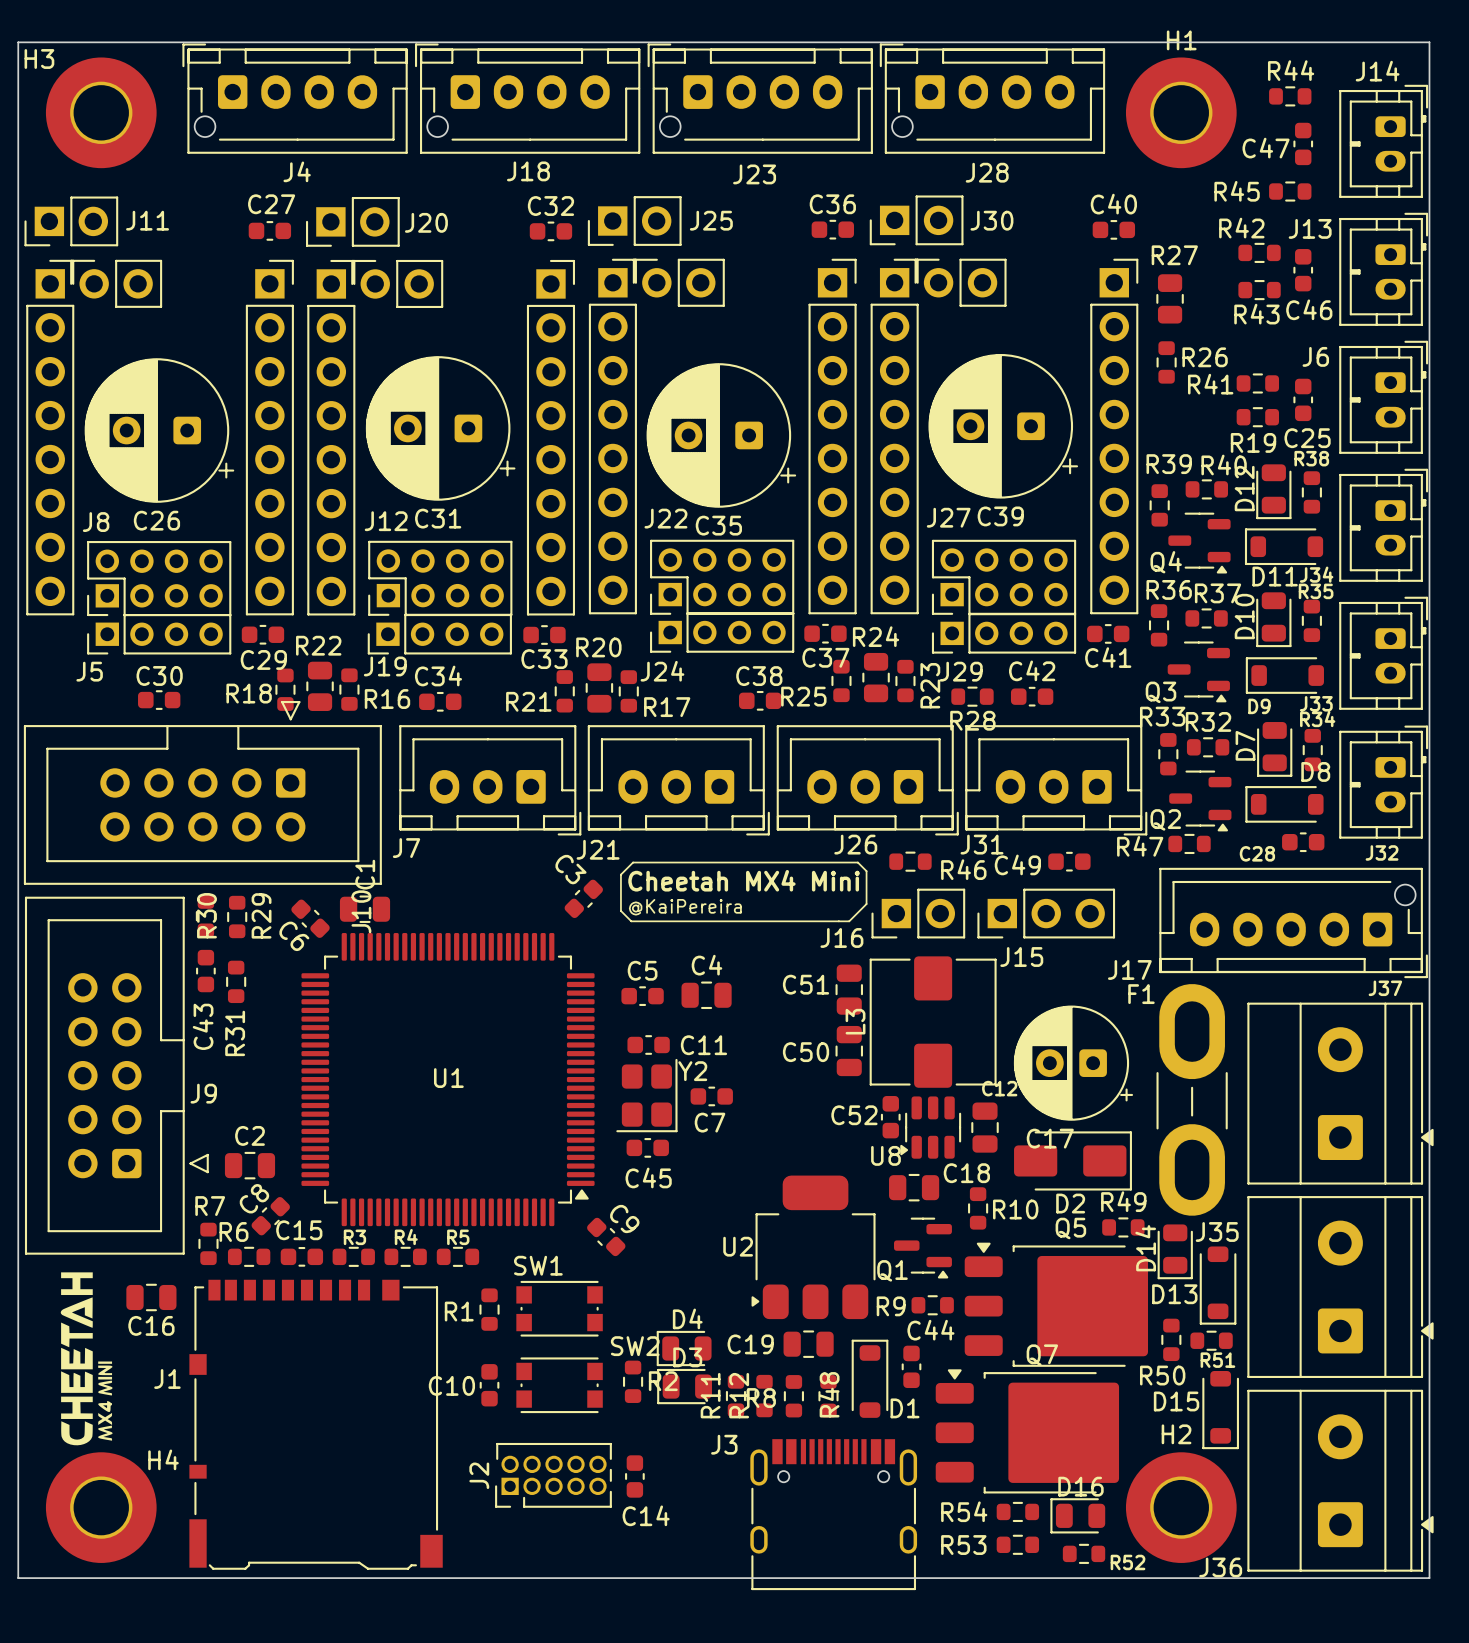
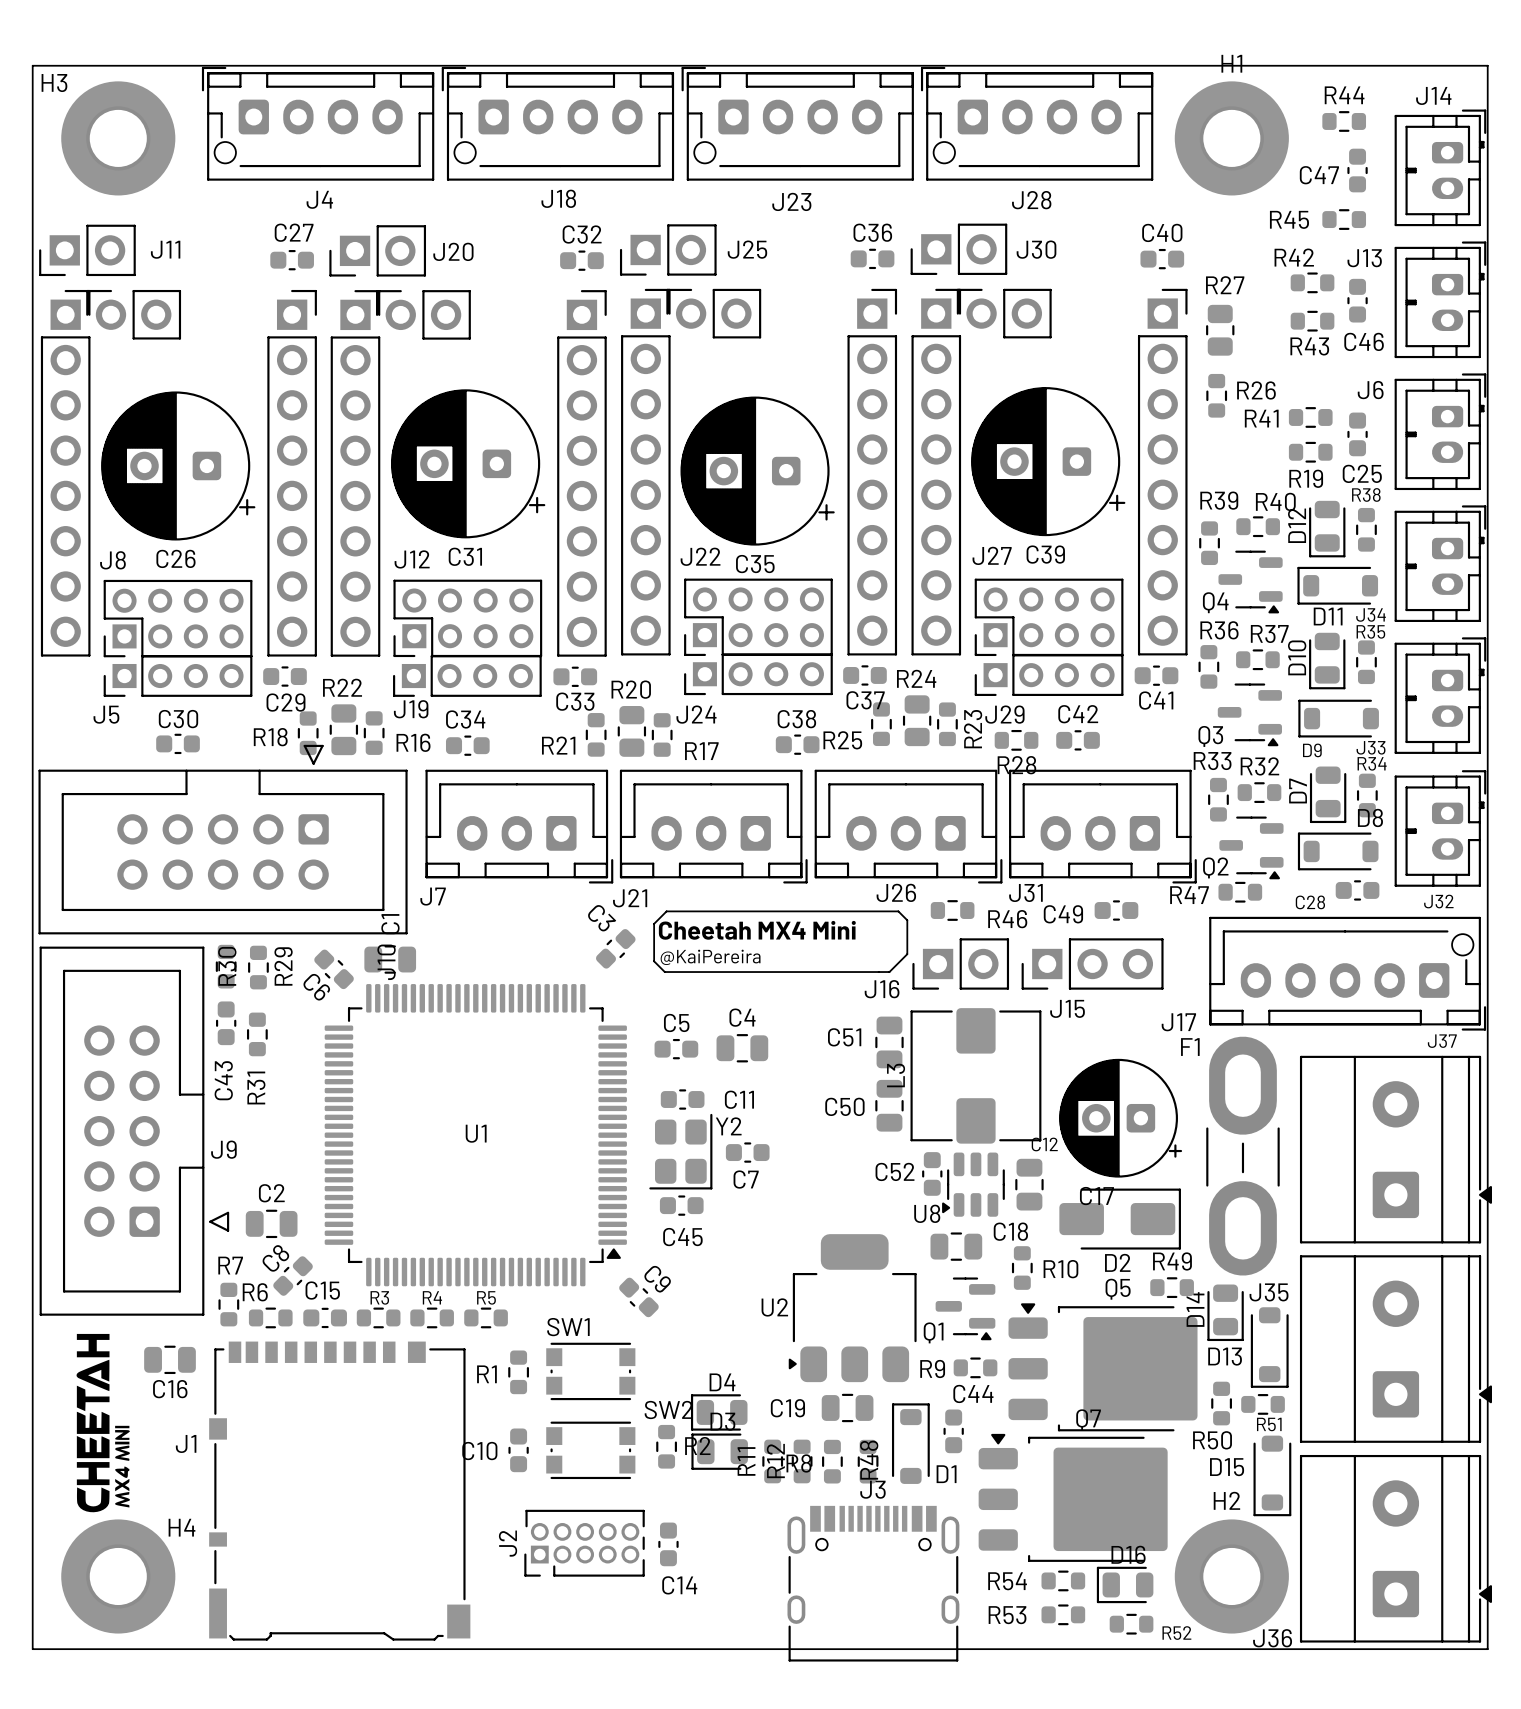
J3 name position: J3 (724, 1444) -> J3 (872, 1489)

